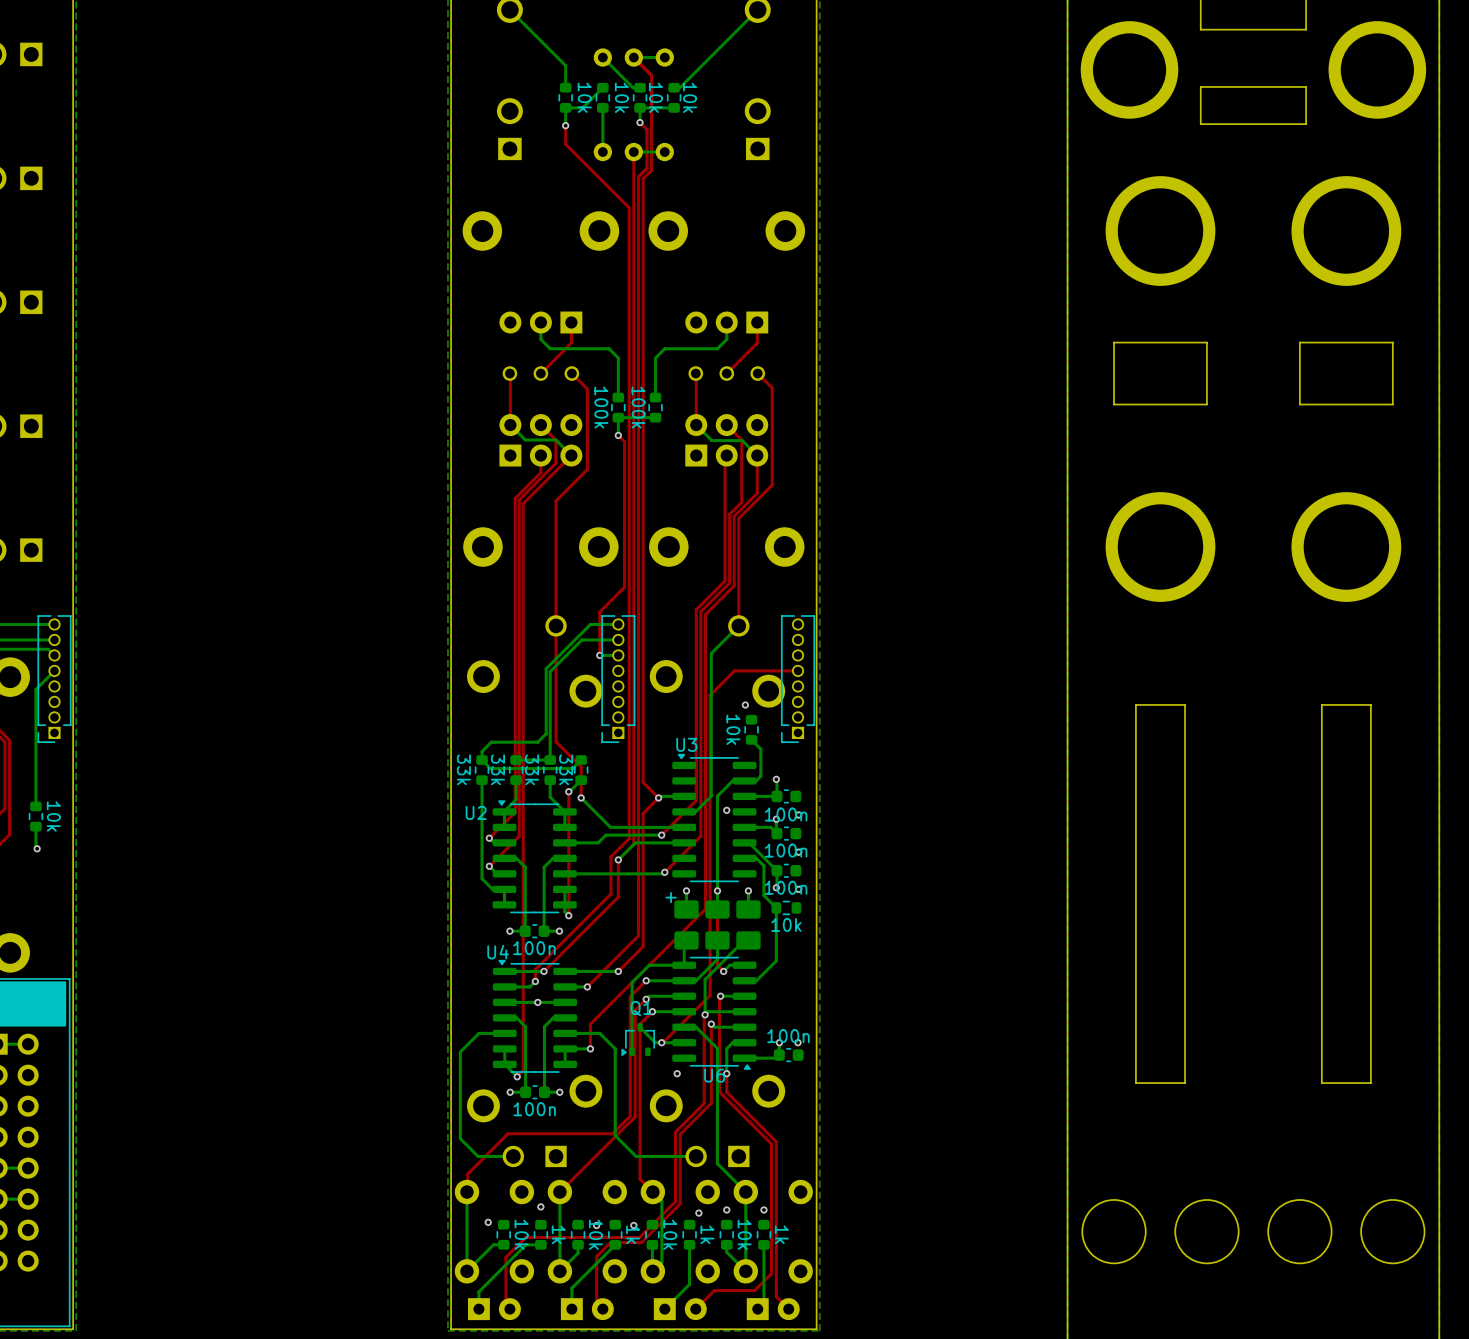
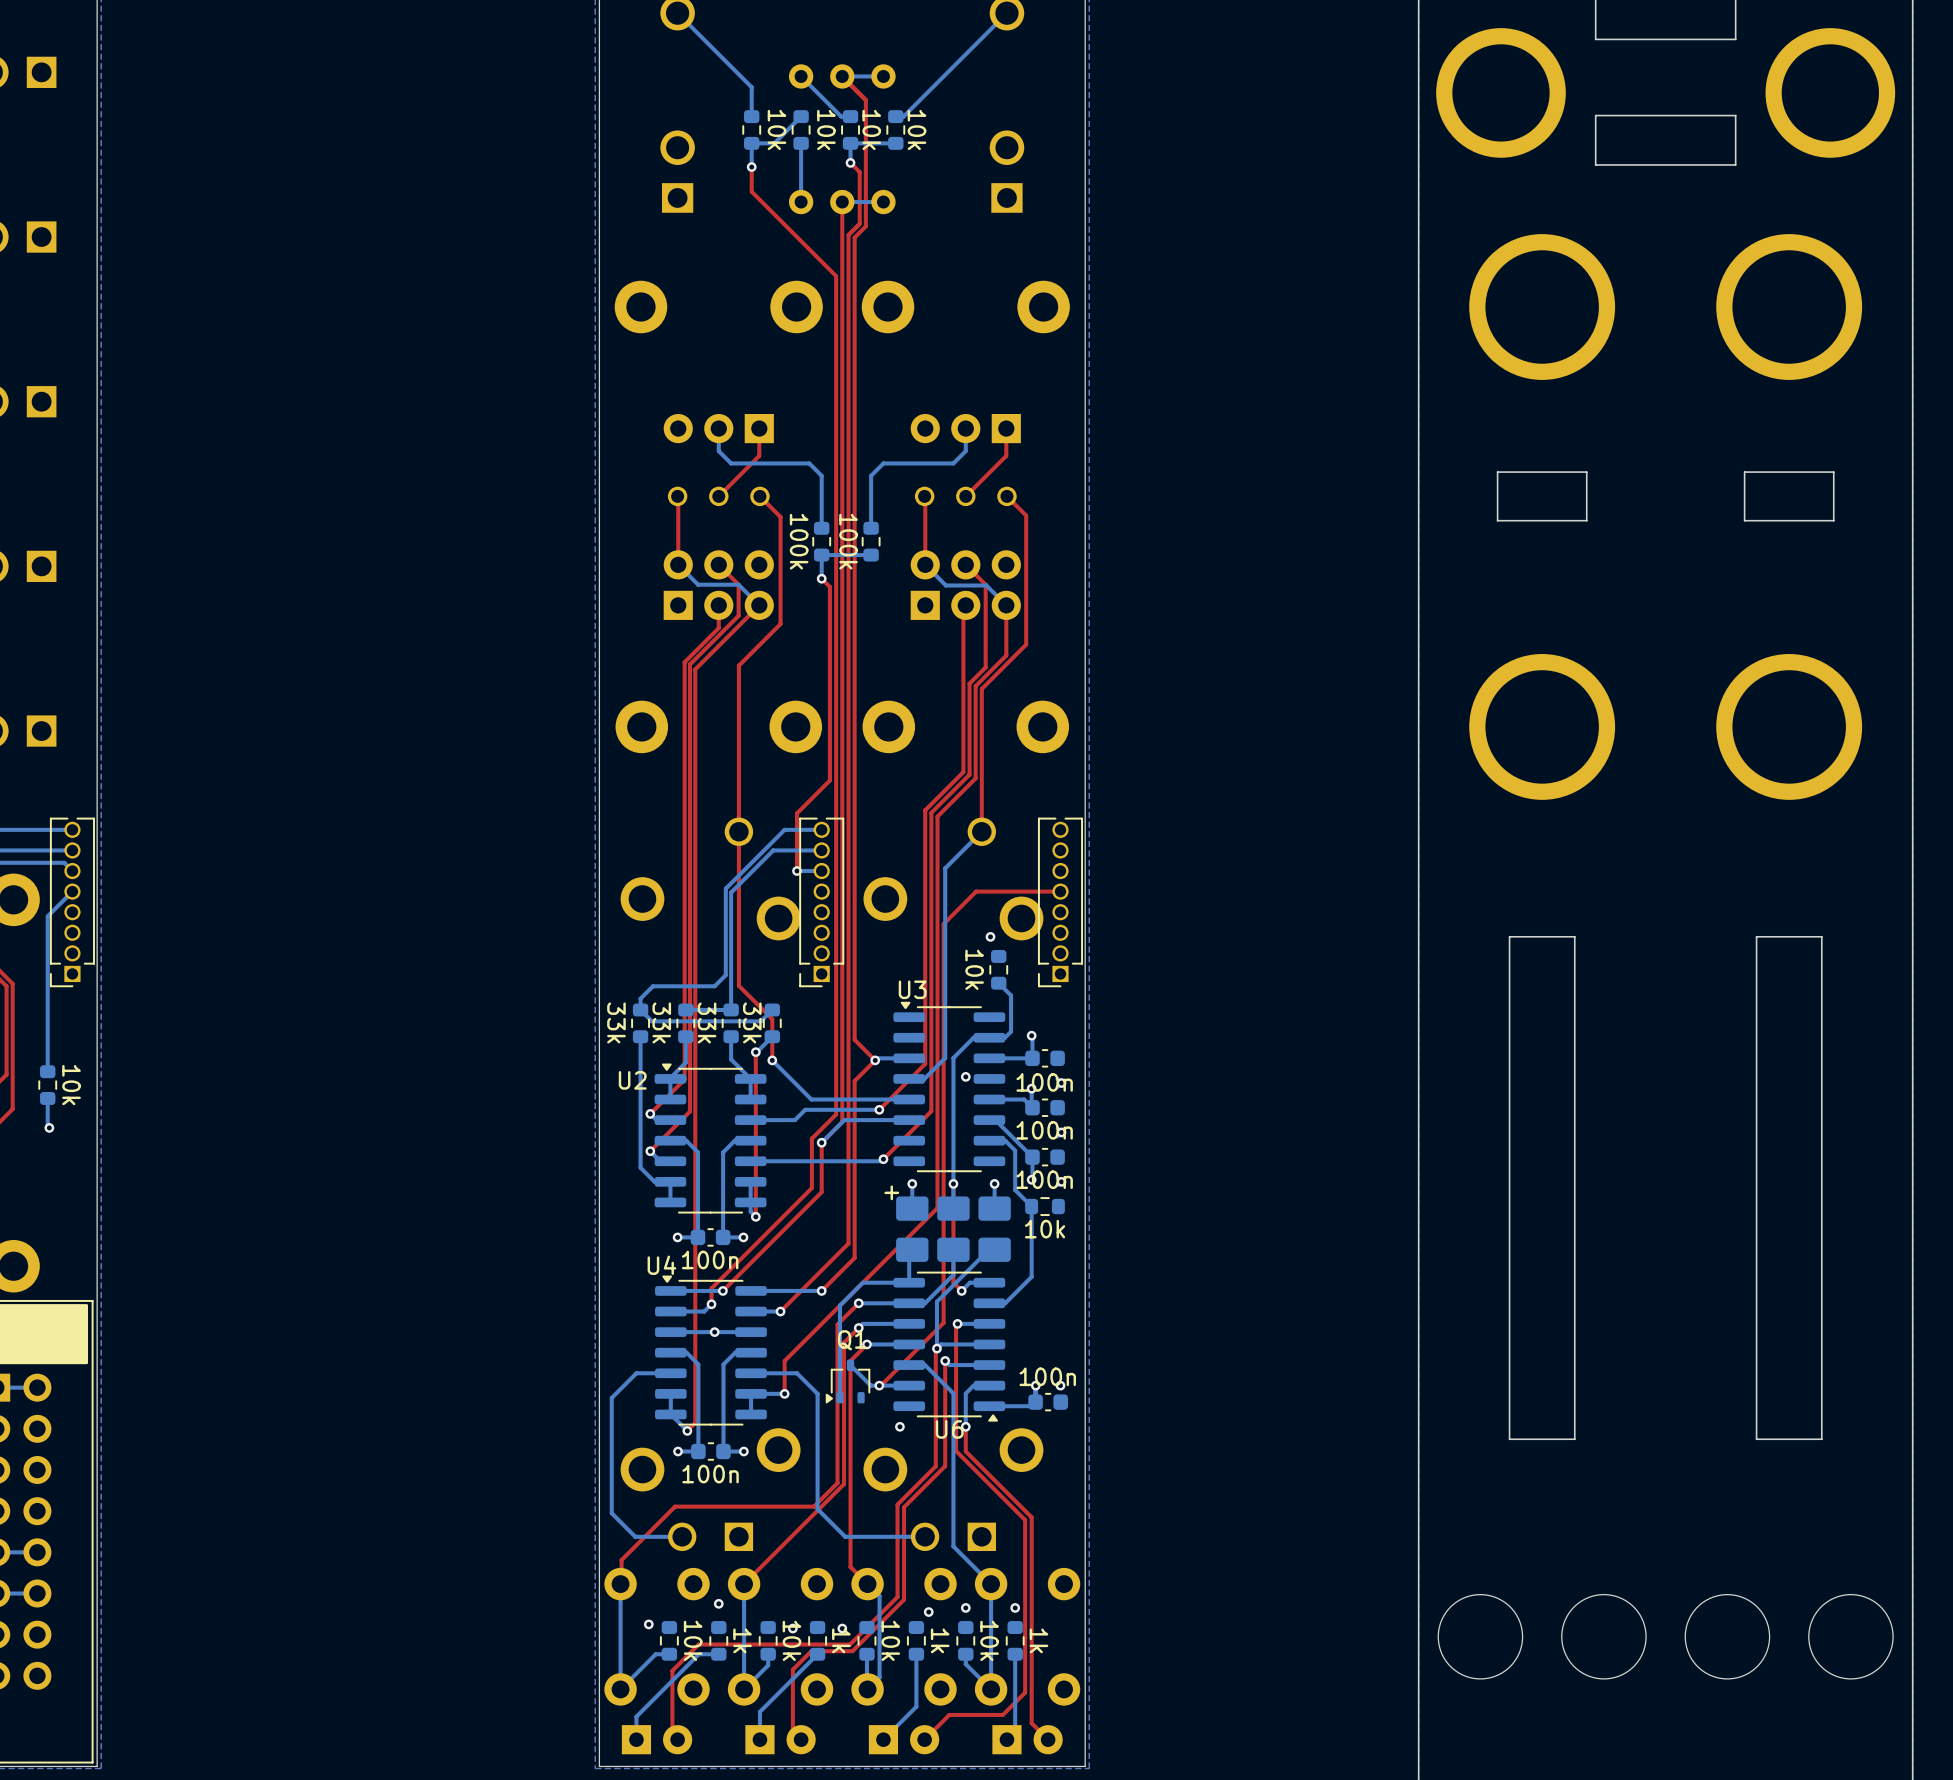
board edge: (1206, 342) (1114, 342) (1114, 404) (1206, 404) (1206, 342) -> none
board edge: (1392, 342) (1299, 342) (1299, 404) (1392, 404) (1392, 342) -> none
board edge: none -> (1586, 472) (1497, 472) (1497, 520) (1586, 520) (1586, 472)
board edge: none -> (1833, 472) (1744, 472) (1744, 520) (1833, 520) (1833, 472)

